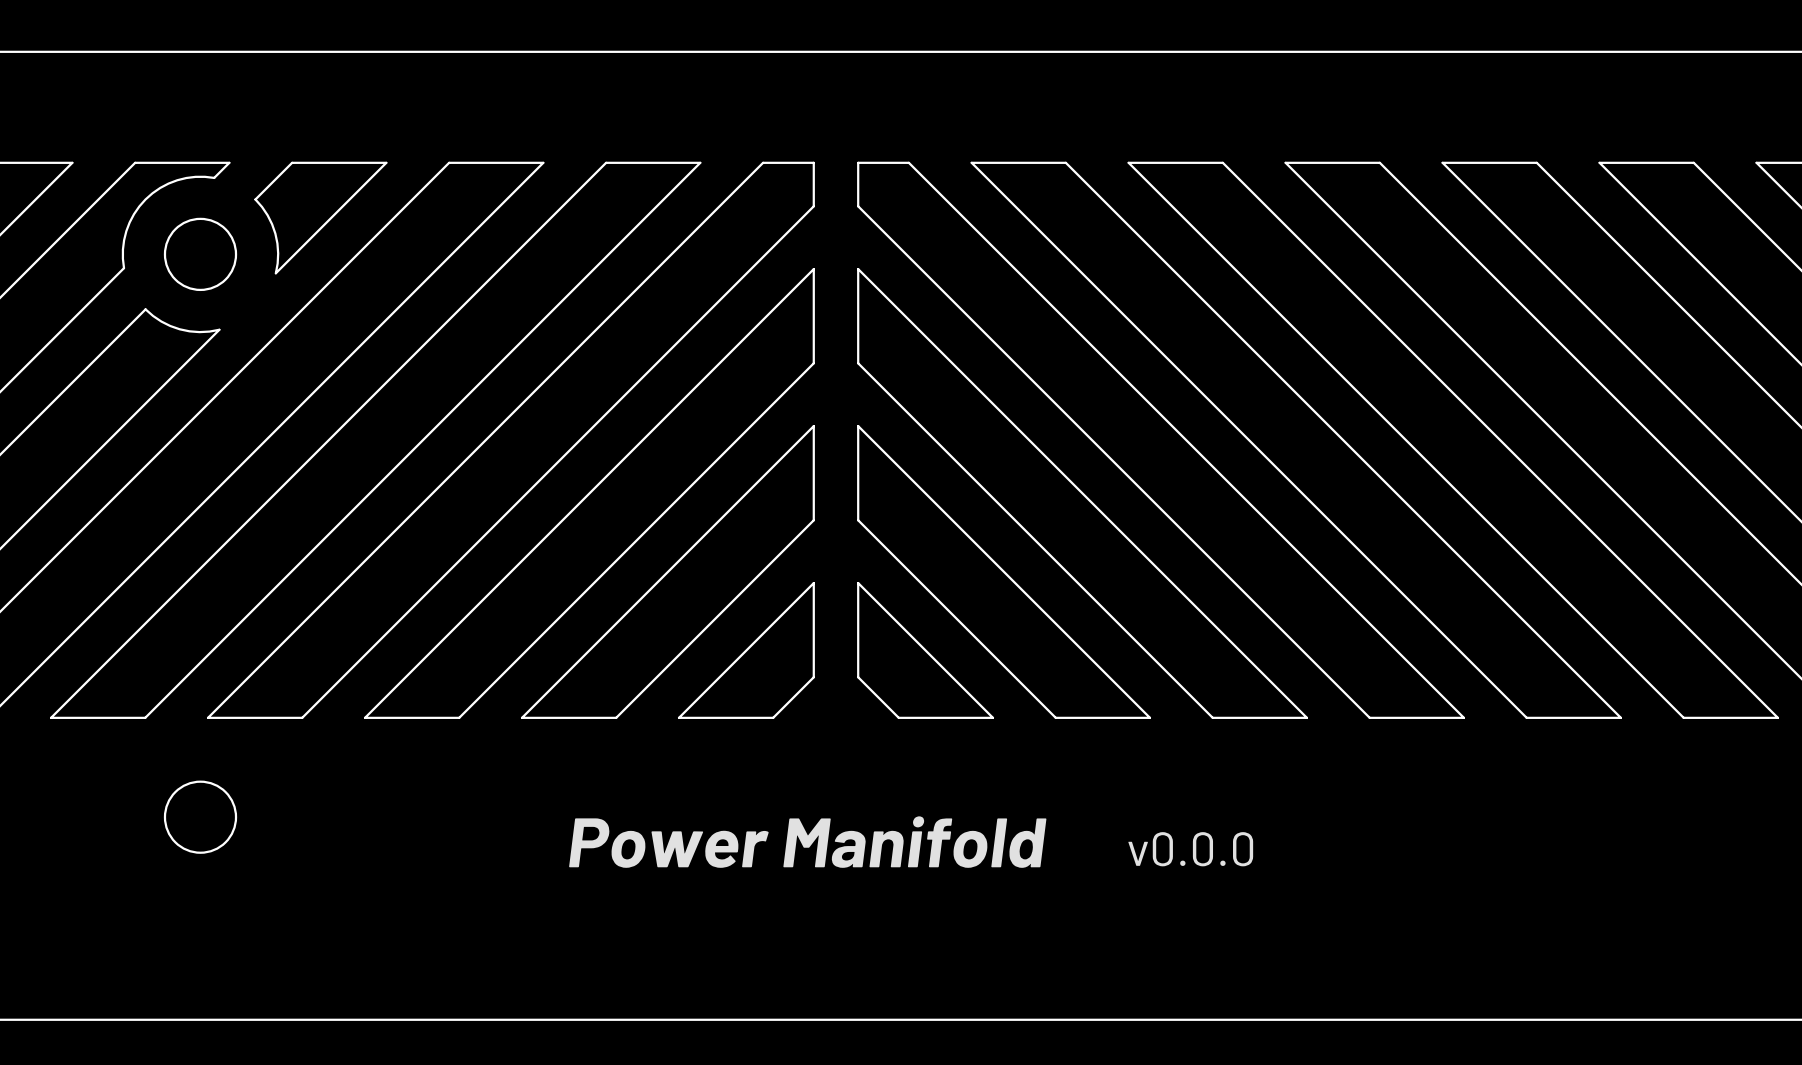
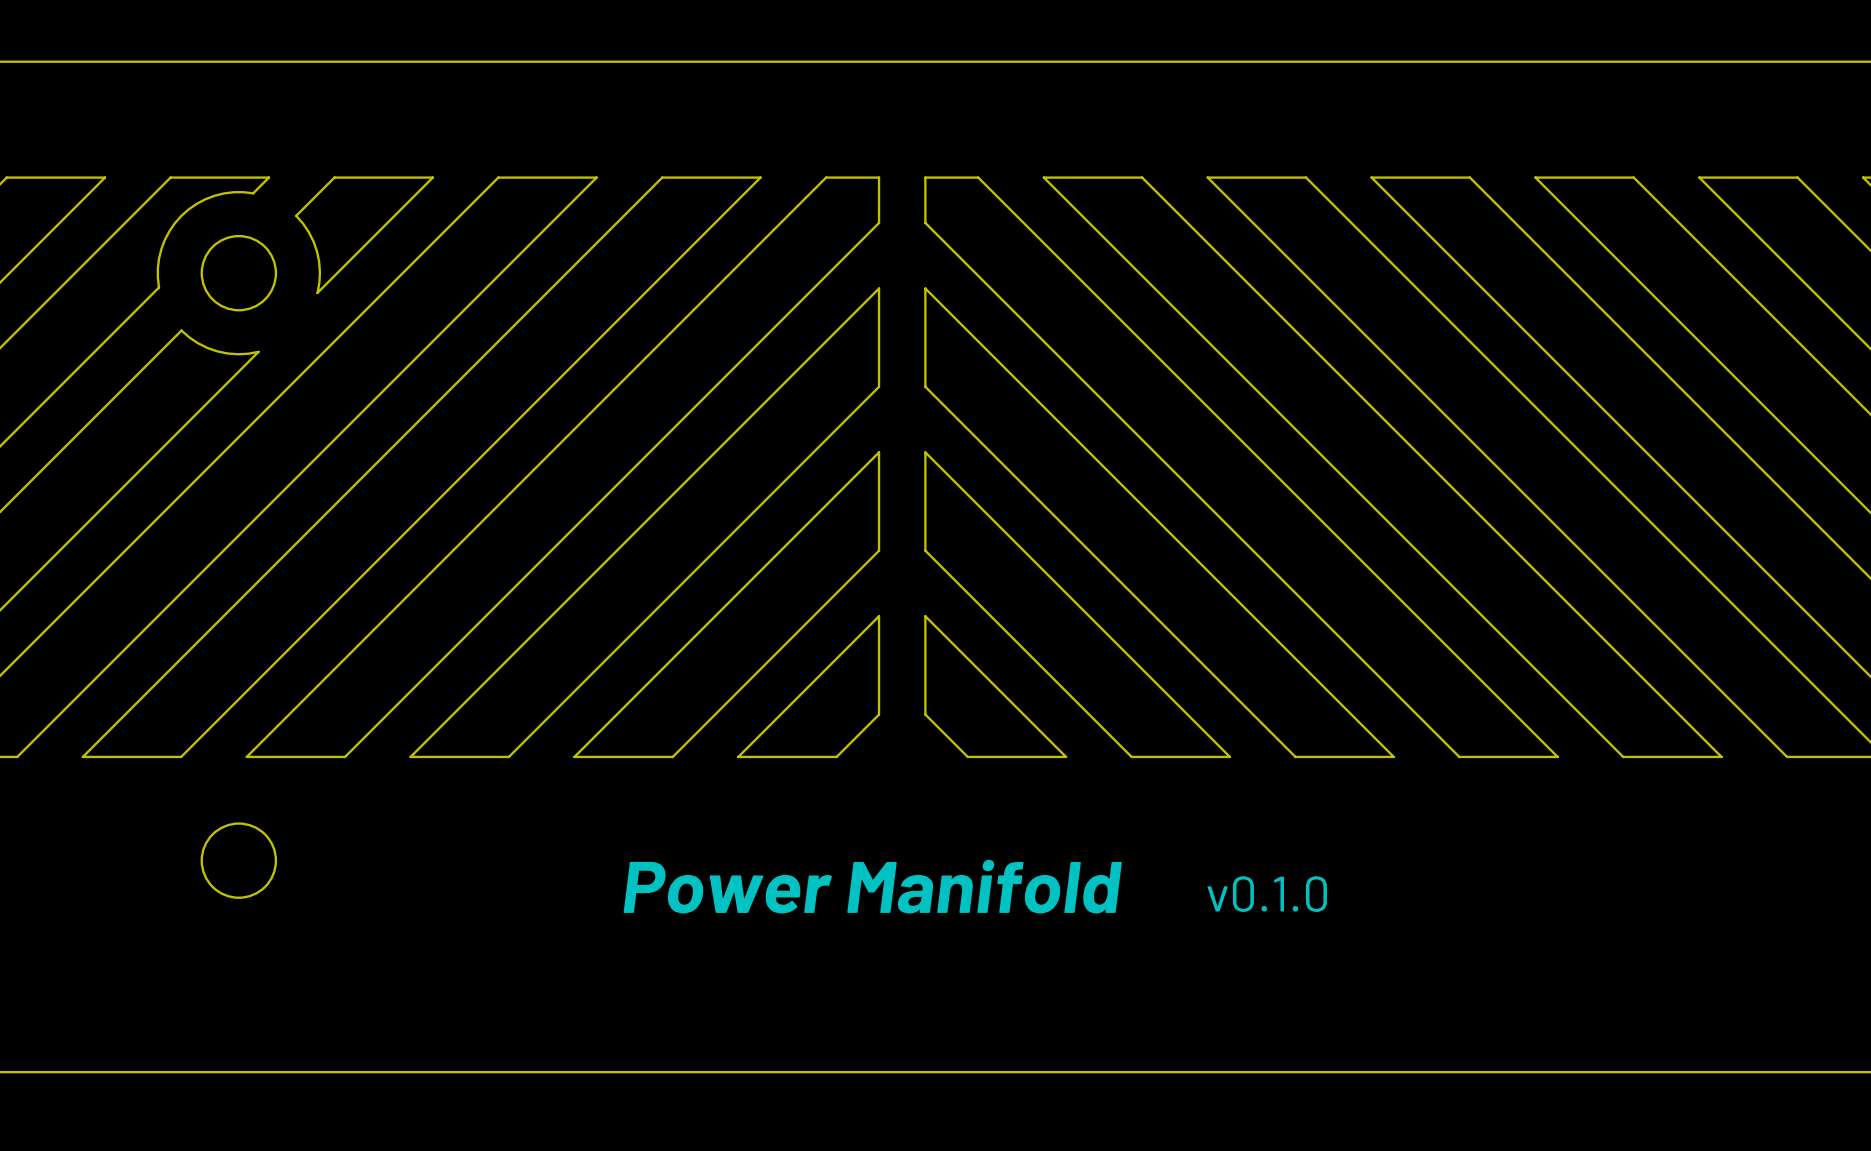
text: v0.0.0 (1190, 849) -> v0.1.0 (1267, 894)

